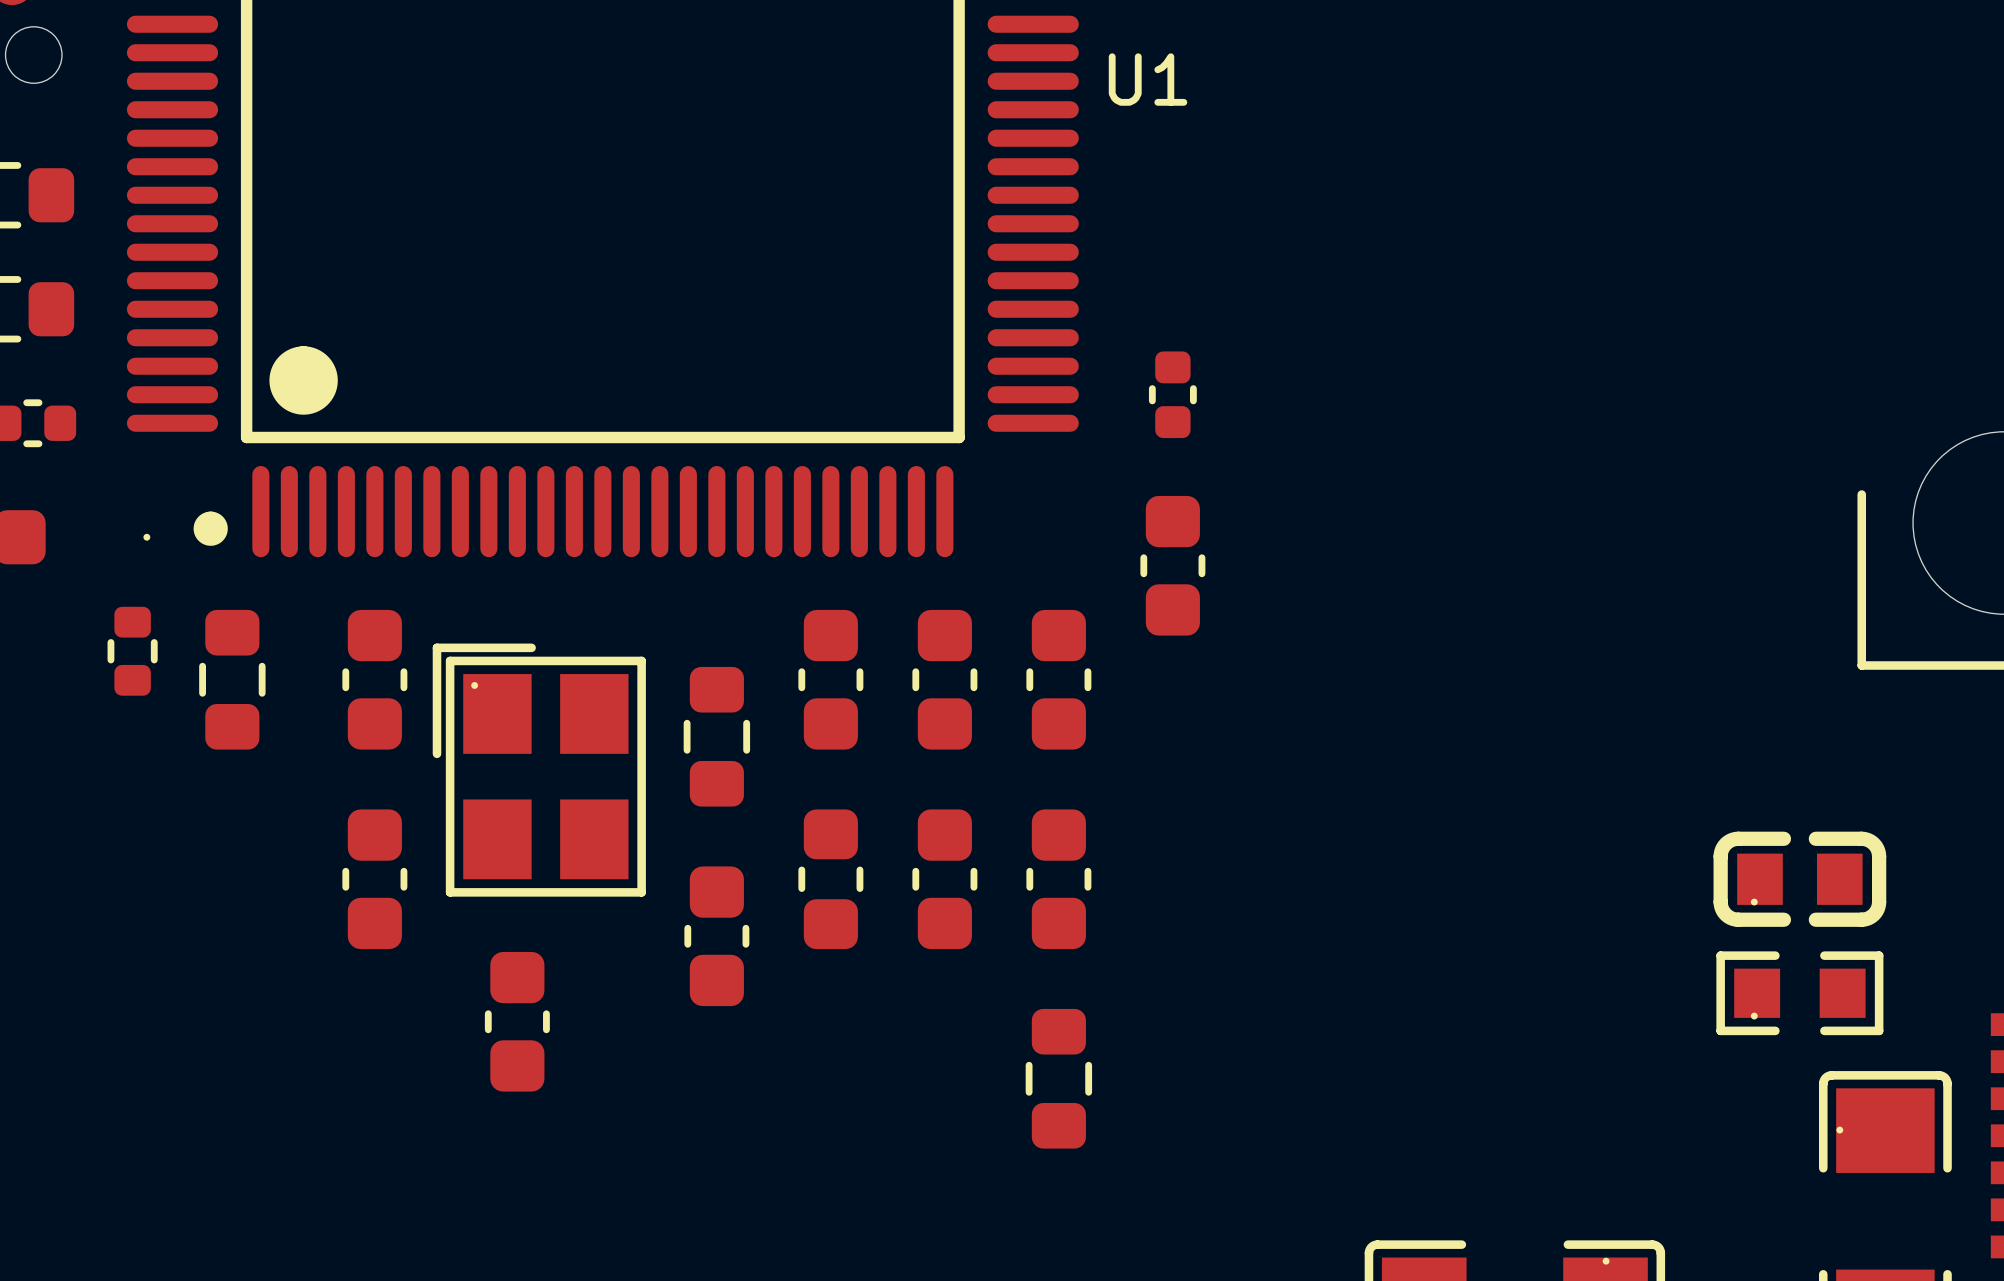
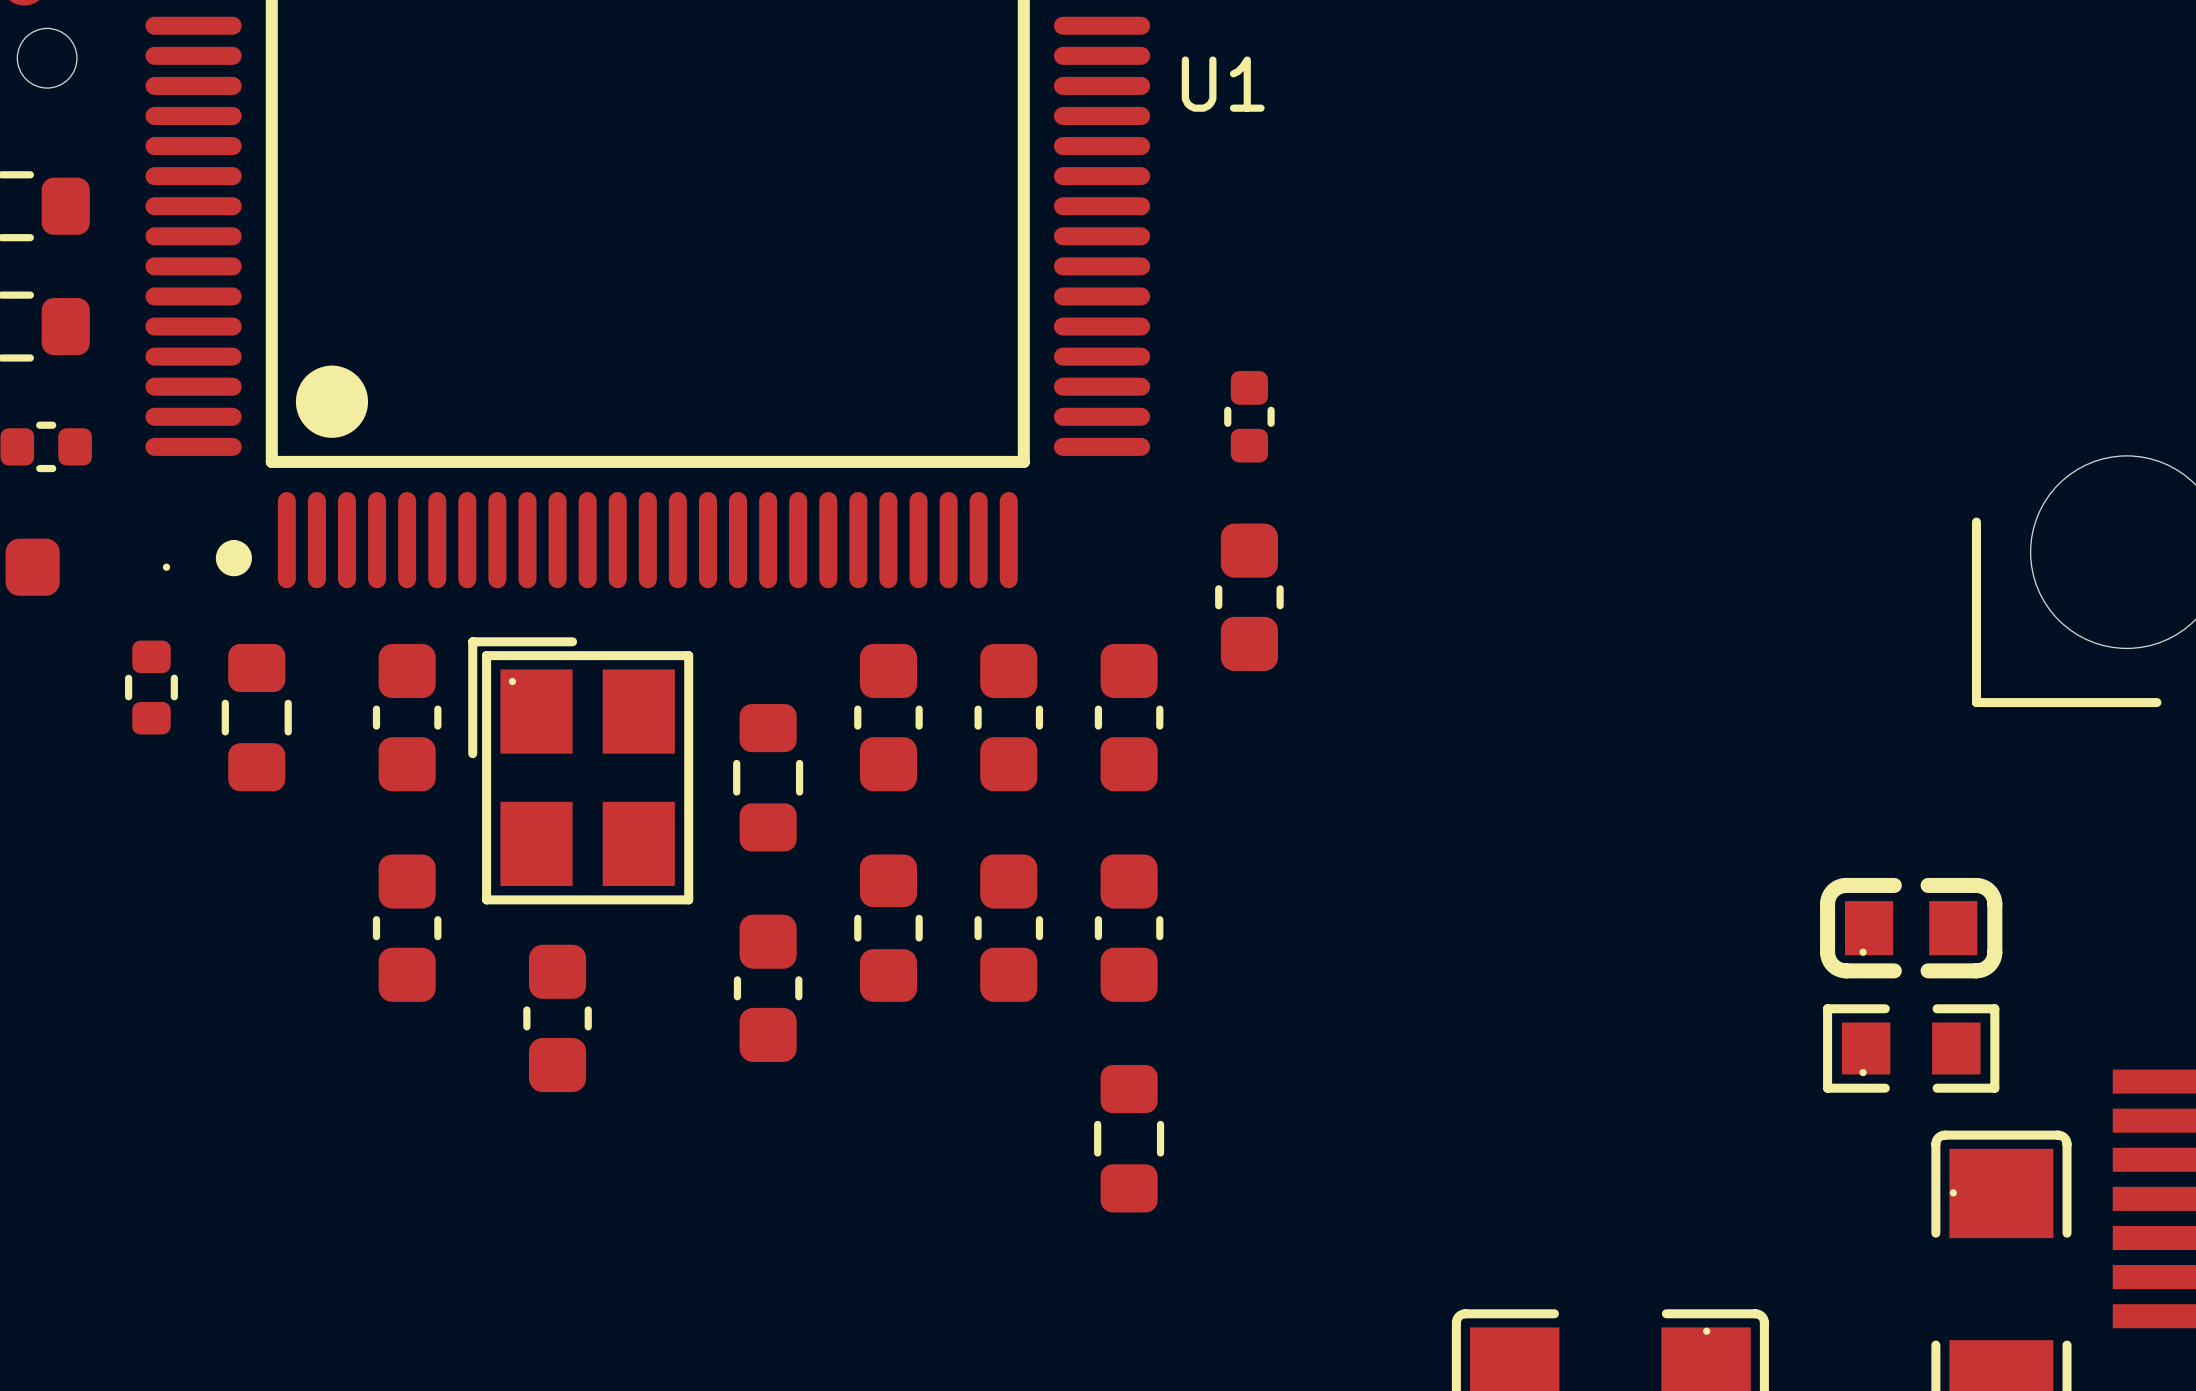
part position: (539, 770) -> (580, 770)
part position: (517, 1021) -> (557, 1018)

